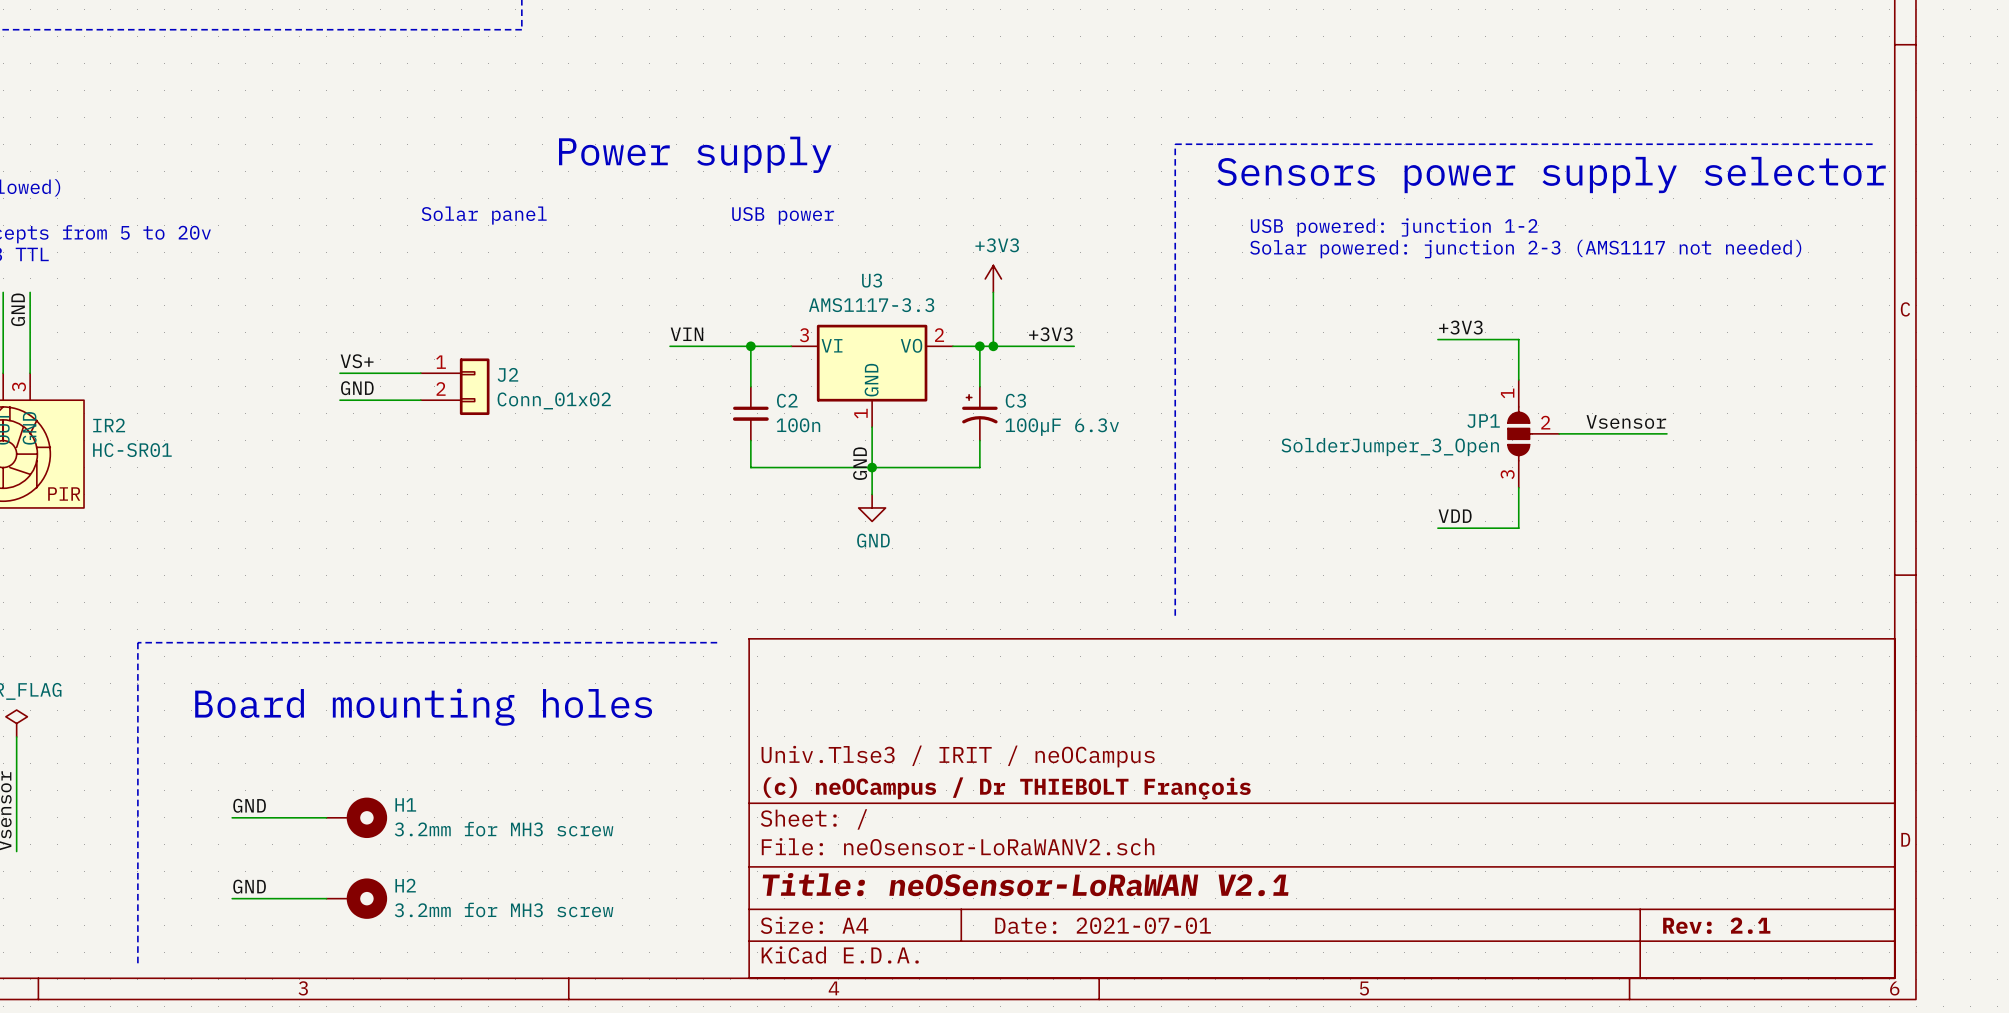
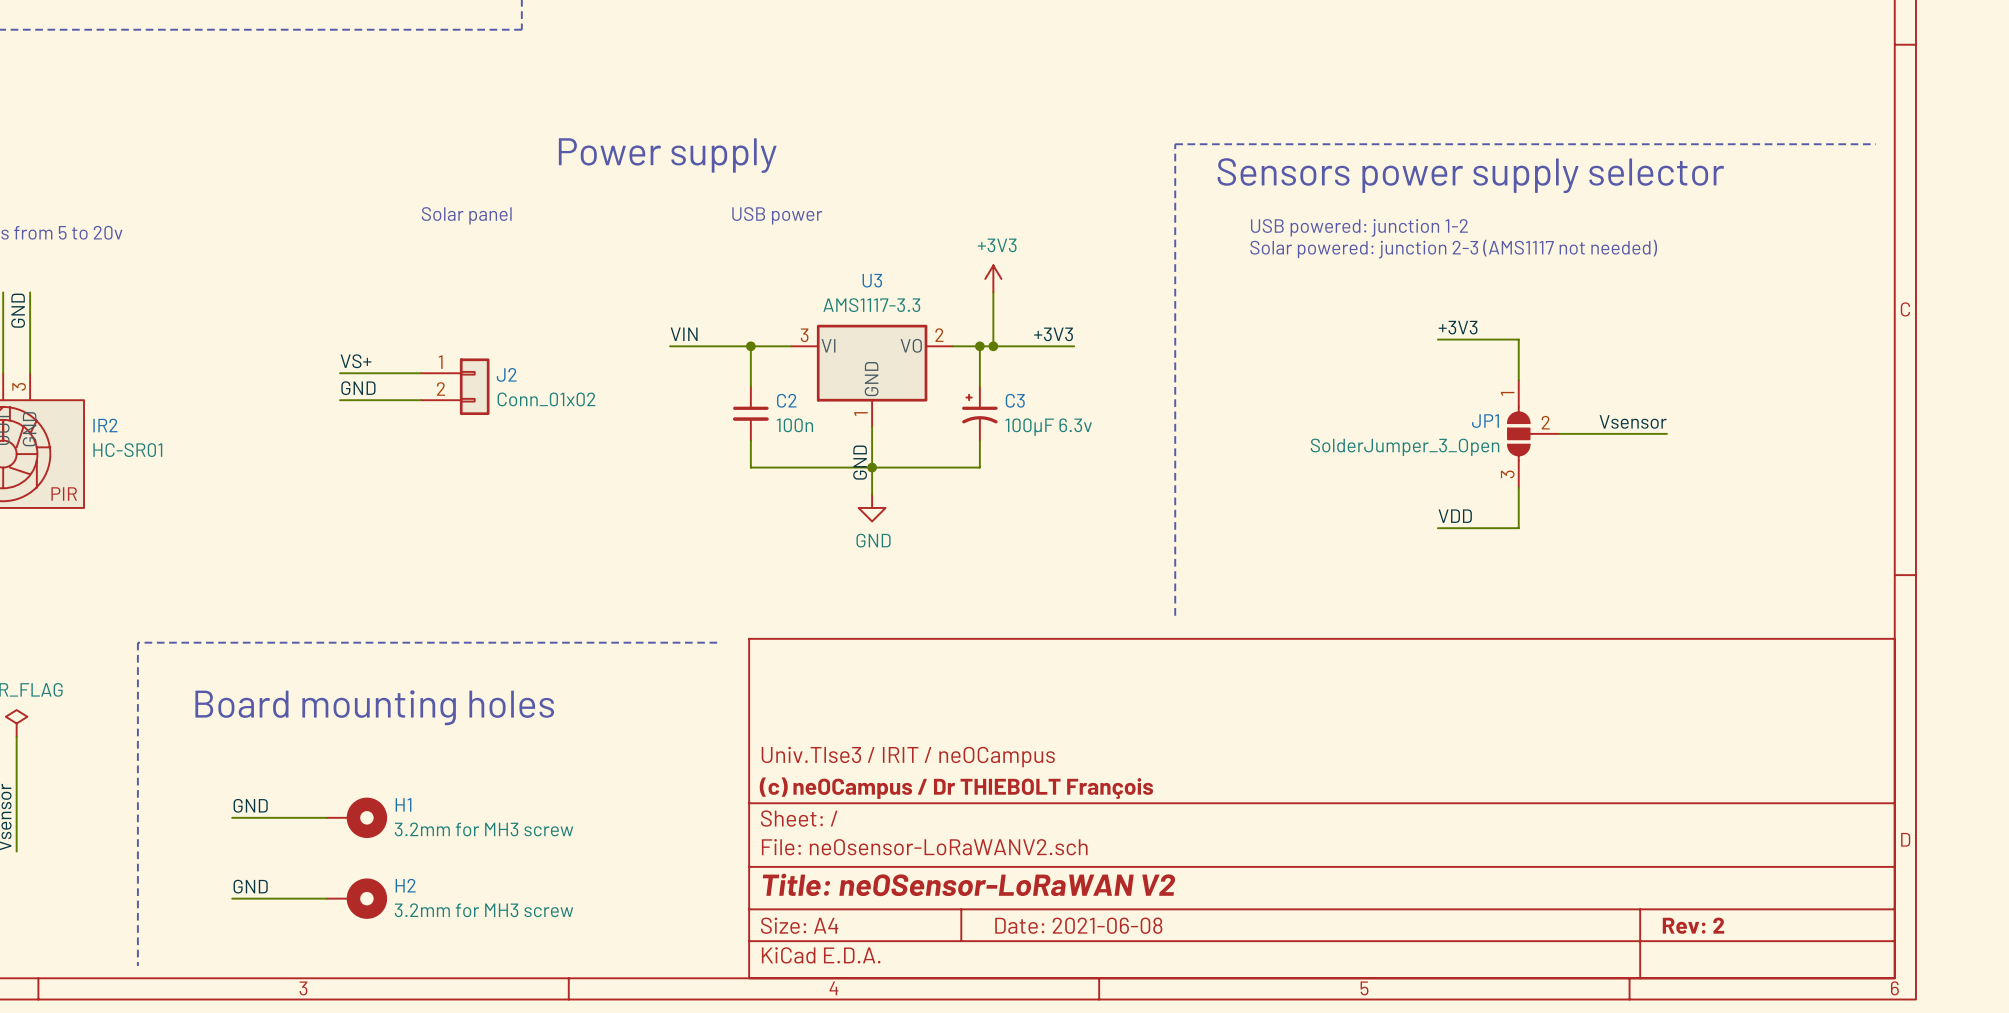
title block: Title: neOSensor-LoRaWAN V2.1 (1025, 884) -> Title: neOSensor-LoRaWAN V2 (969, 884)
title block: Date: 2021-07-01 (1103, 925) -> Date: 2021-06-08 (1078, 925)
title block: Rev: 2.1 (1716, 925) -> Rev: 2 (1693, 925)

